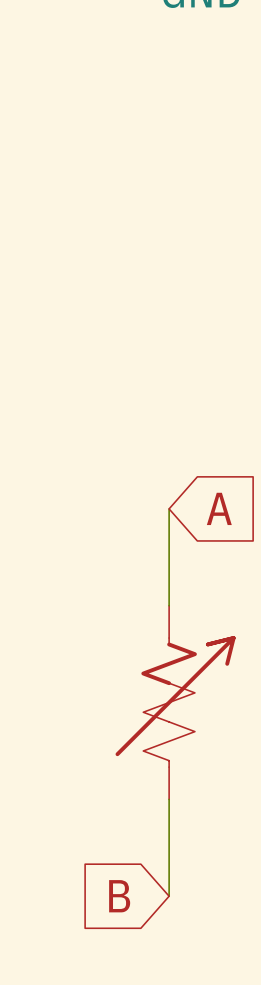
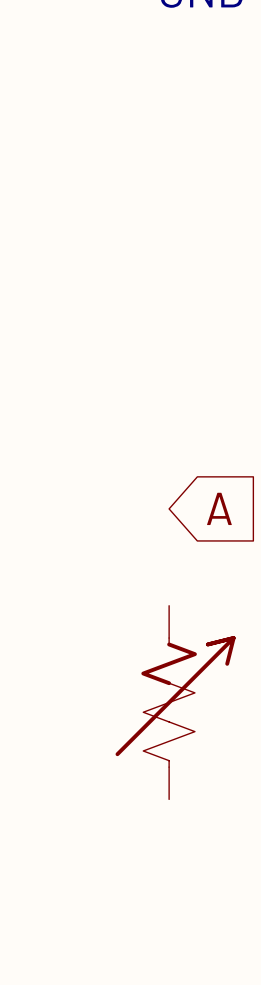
wire: (169, 508) (169, 605) -> none
wire: (169, 799) (169, 896) -> none
global label: B (119, 896) -> none

